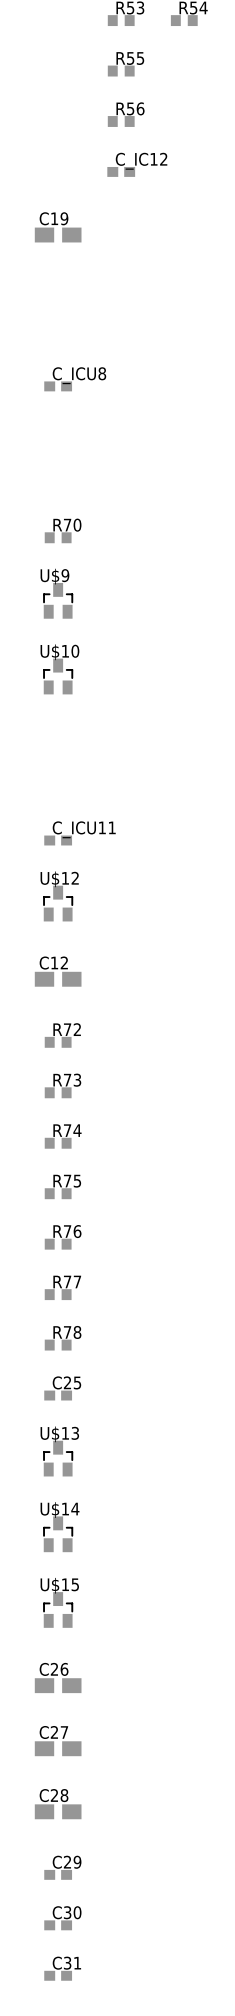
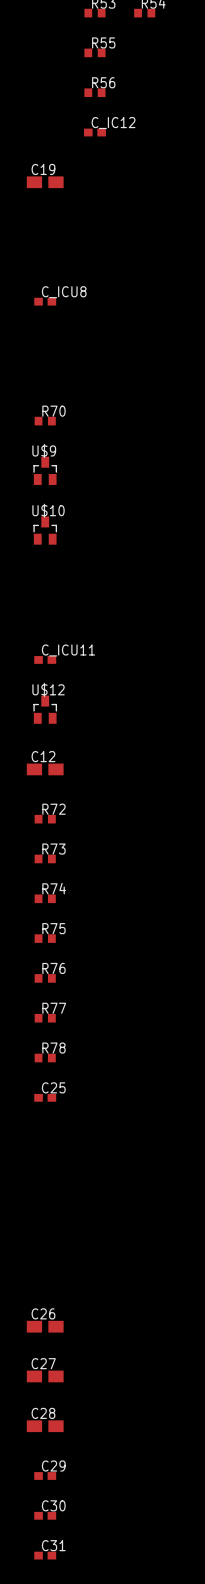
U$13: (58, 1458) -> none
U$14: (58, 1534) -> none
U$15: (58, 1609) -> none

